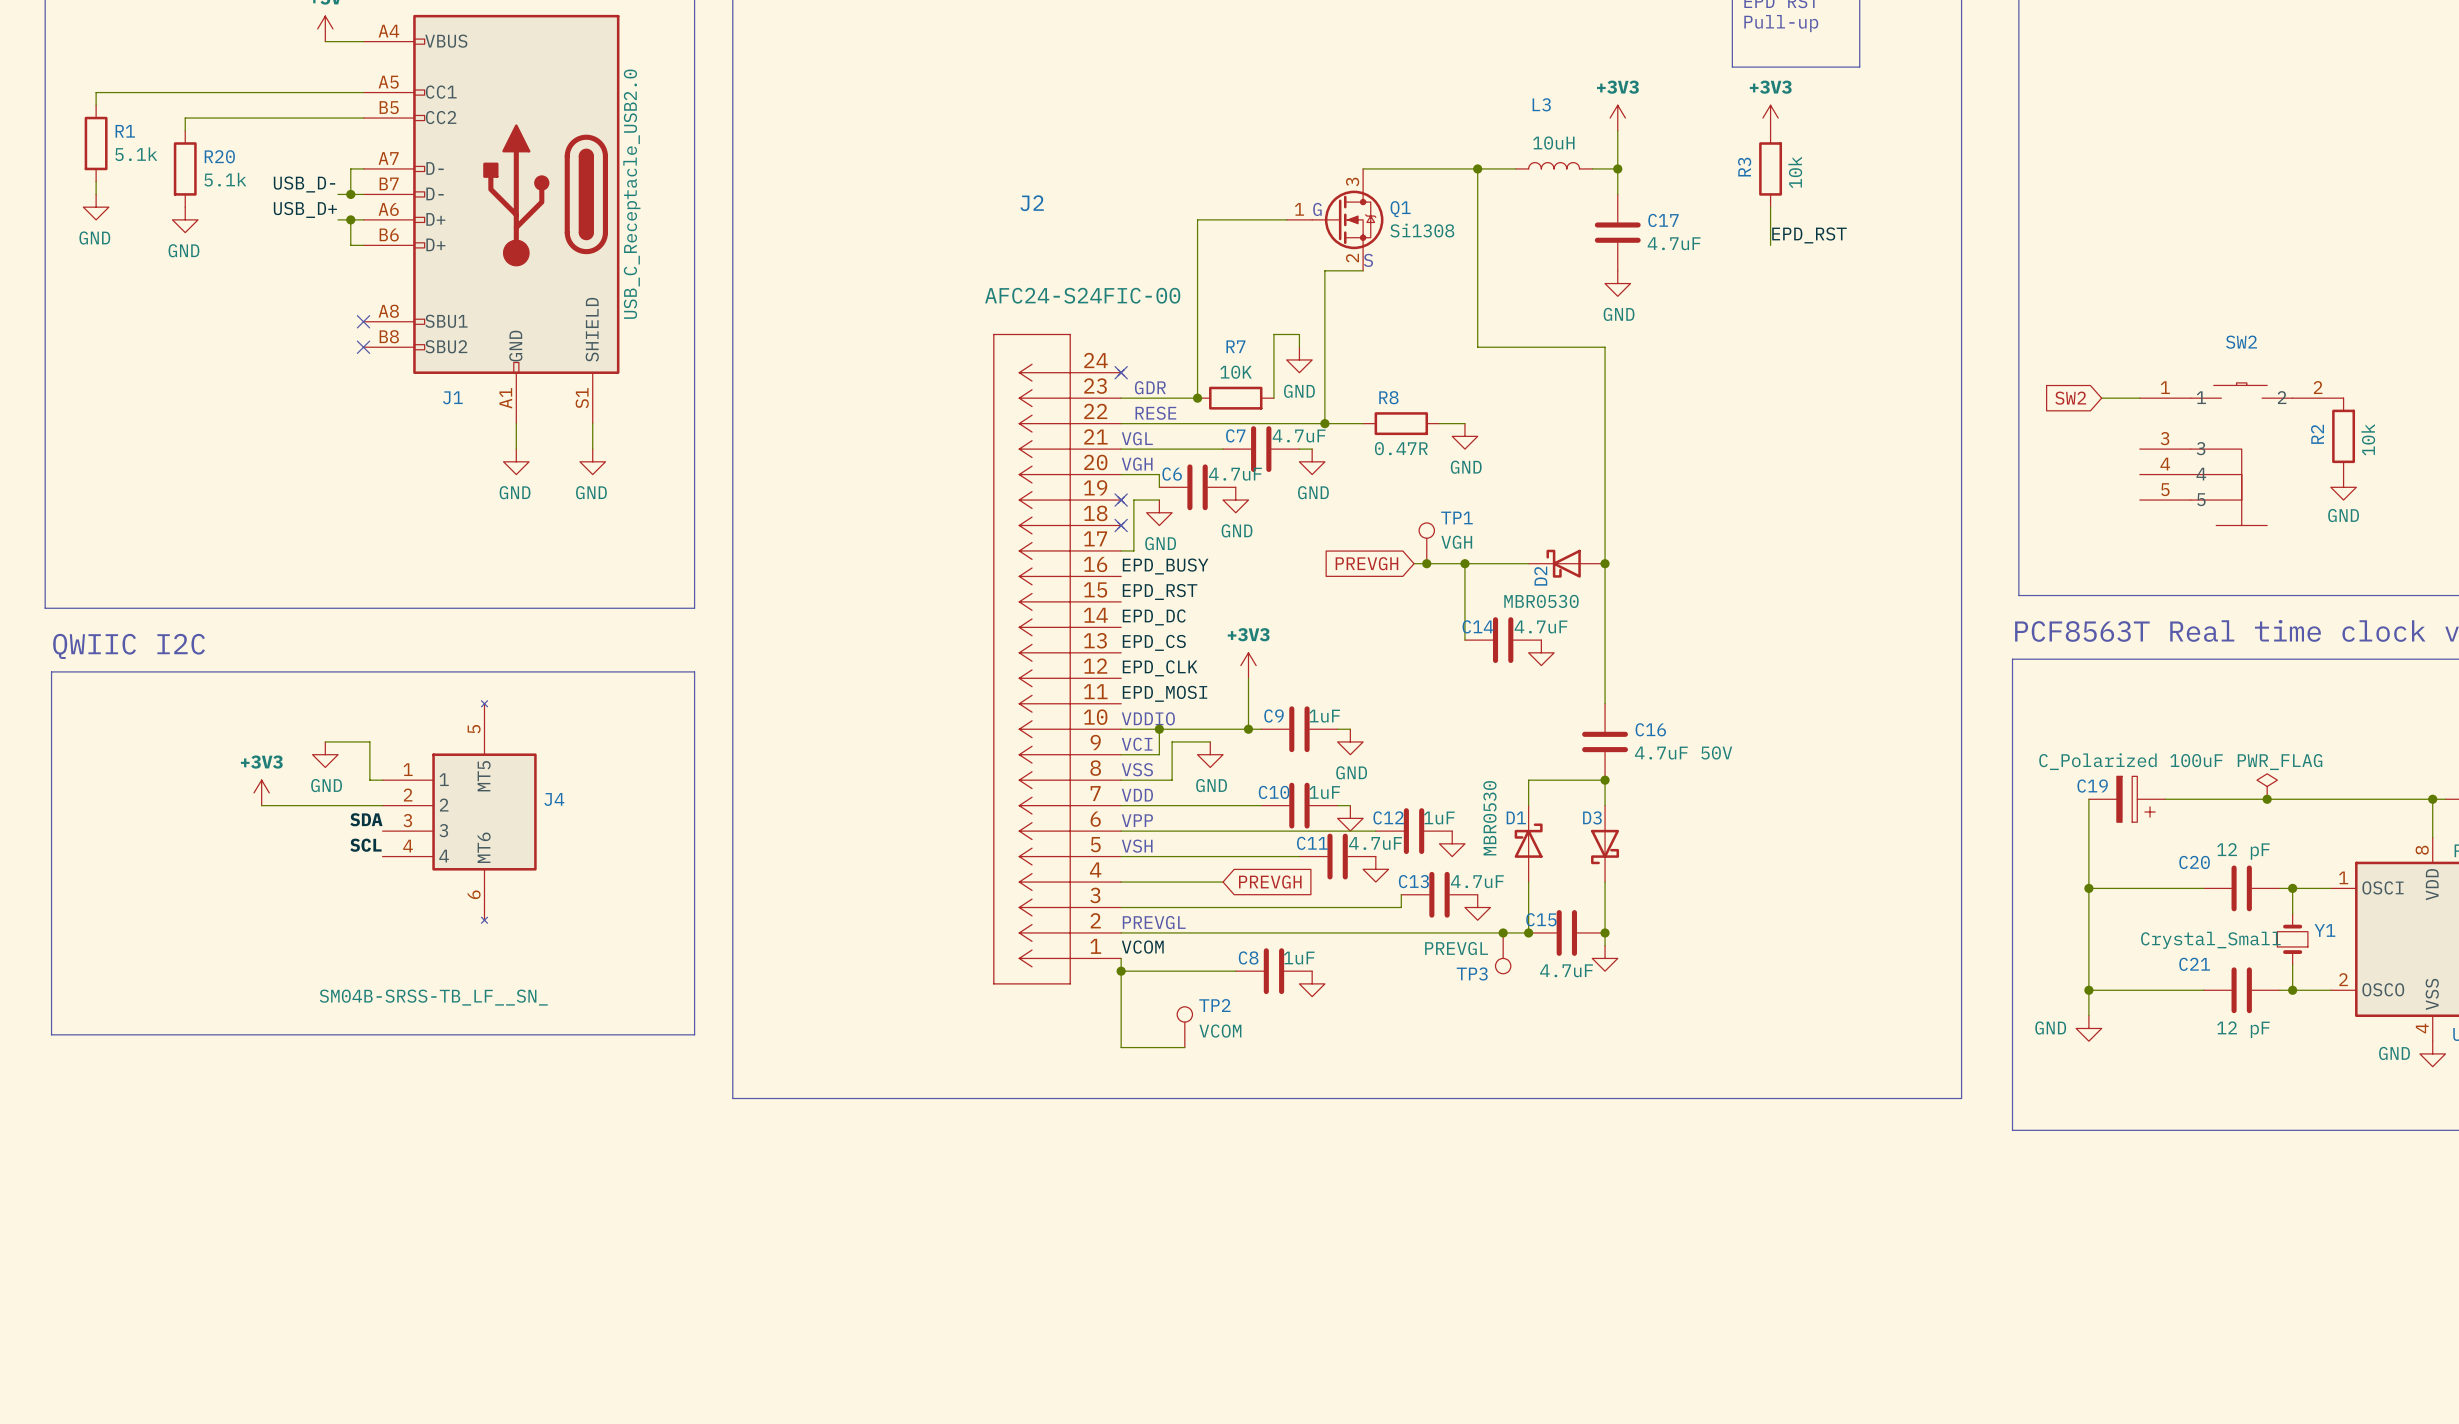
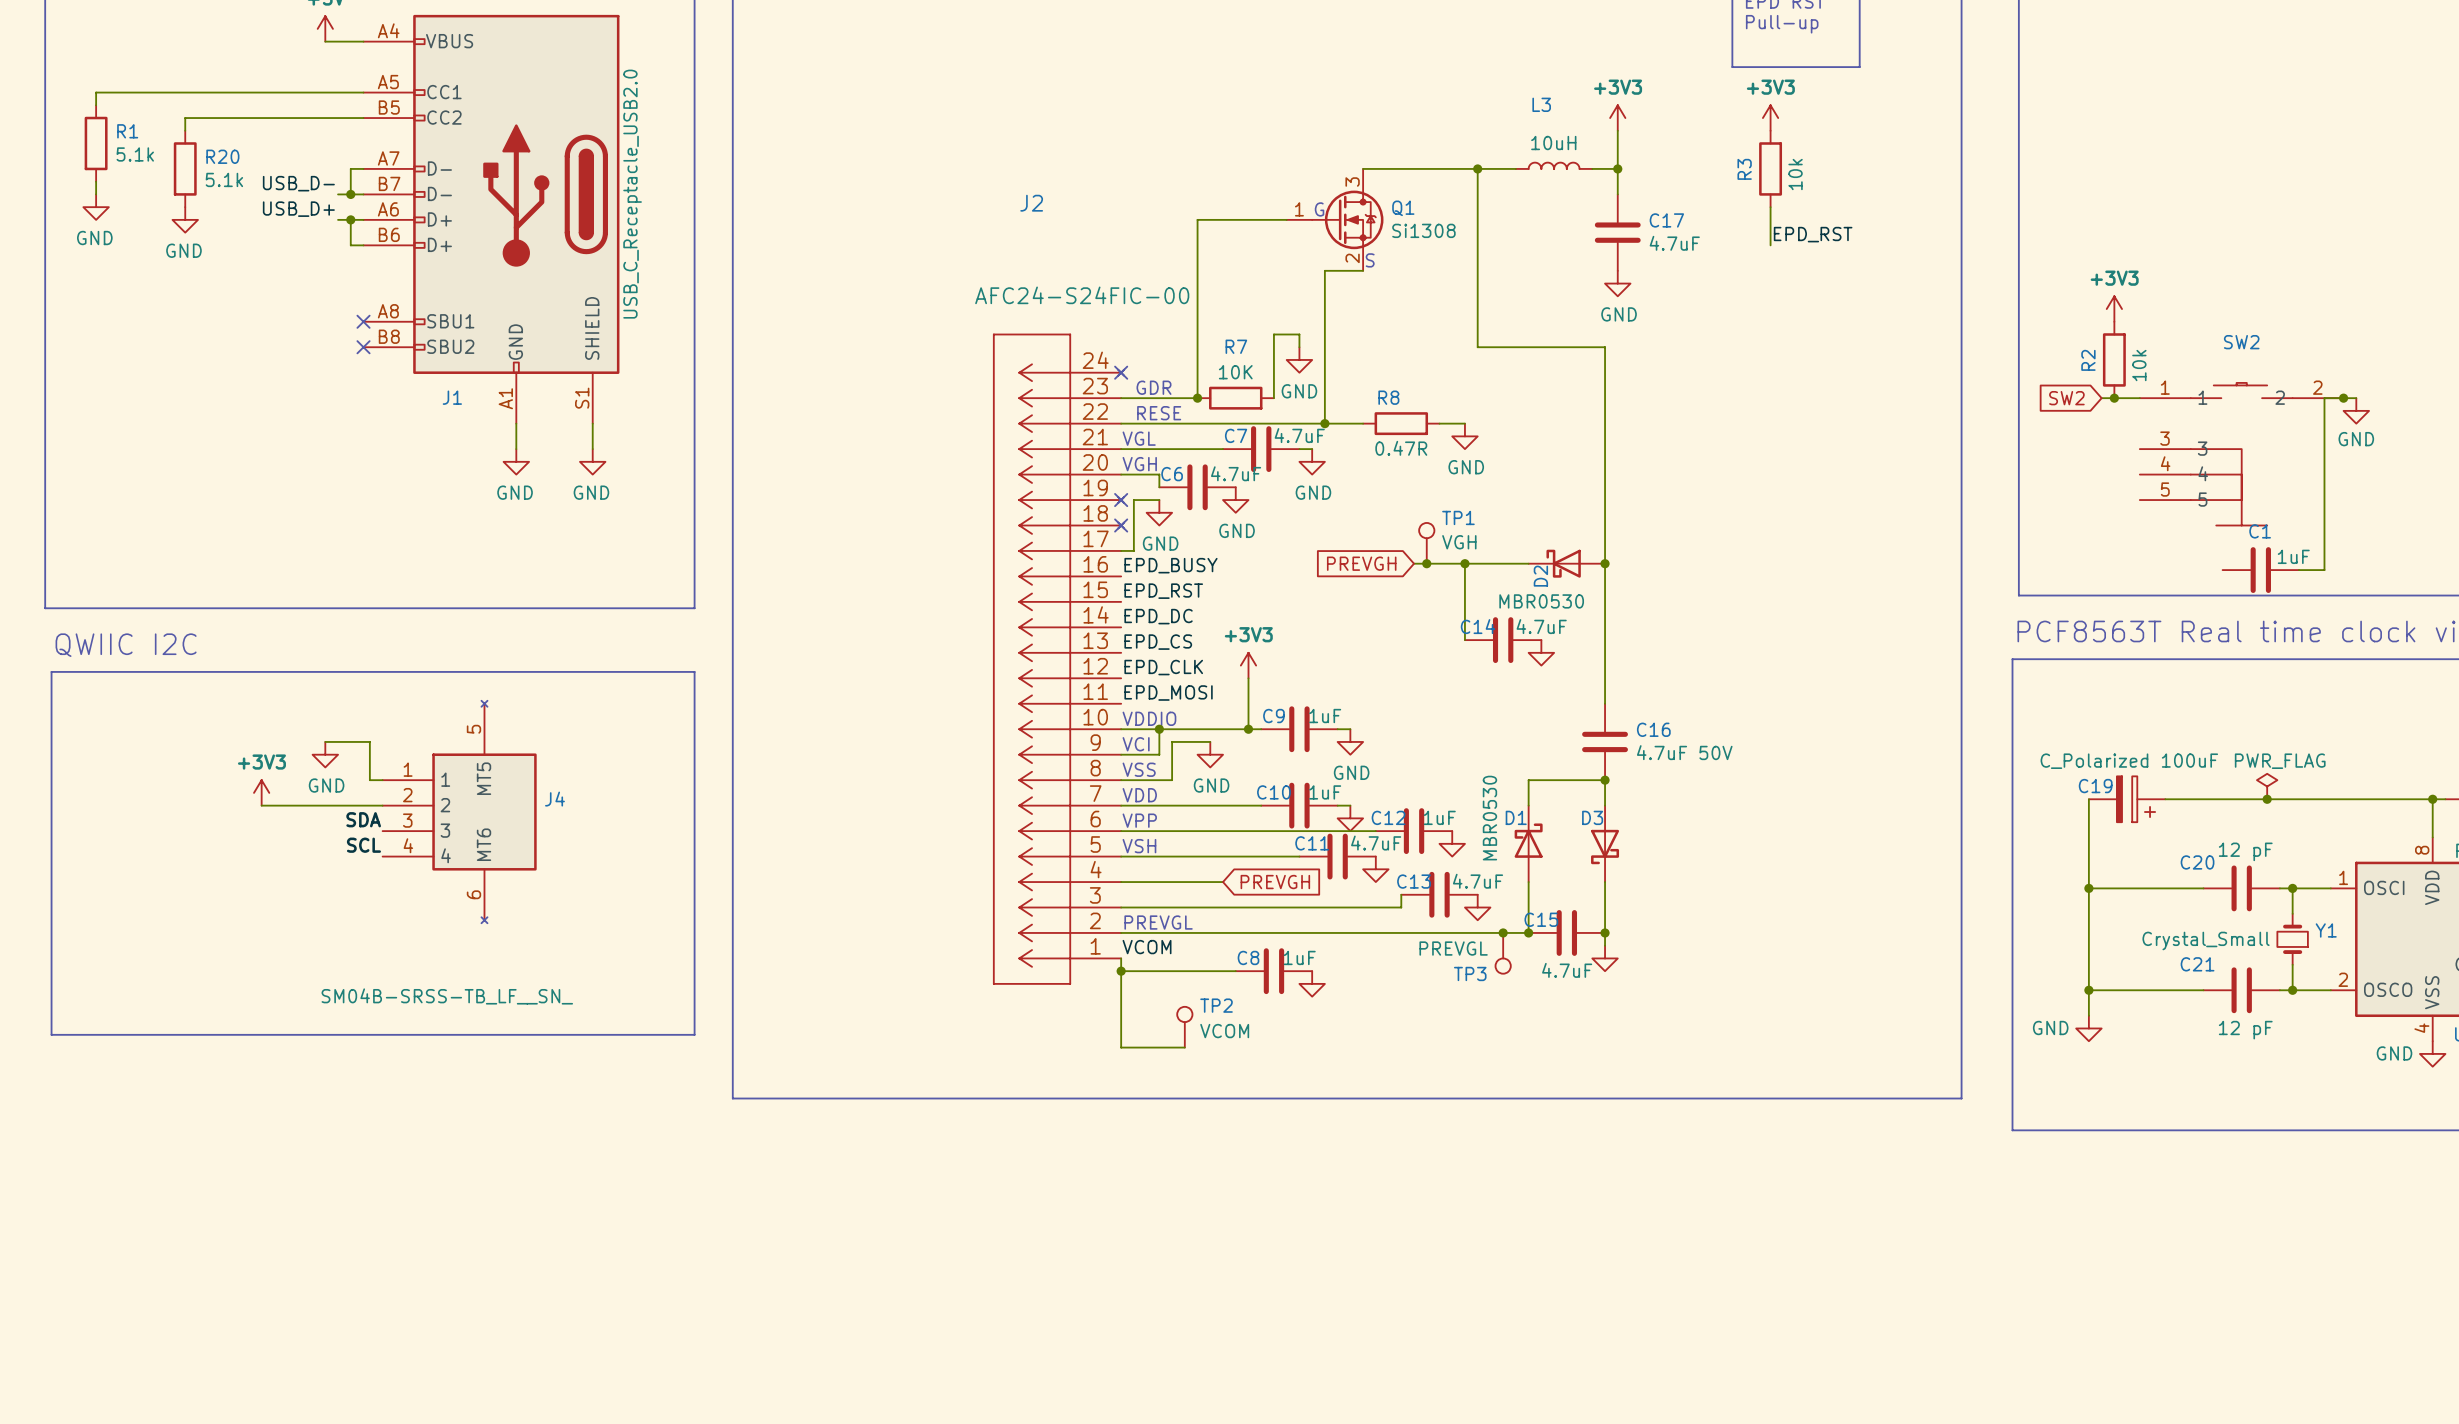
power symbol: none -> +3V3 (2114, 309)
junction: none -> (2114, 398)
junction: none -> (2343, 398)
wire: none -> (2356, 398) (2324, 398) (2324, 570) (2299, 570)
R2 position: (2343, 436) -> (2114, 359)
power symbol position: GND (2343, 487) -> GND (2356, 410)
C1: none -> 1uF (2260, 570)

